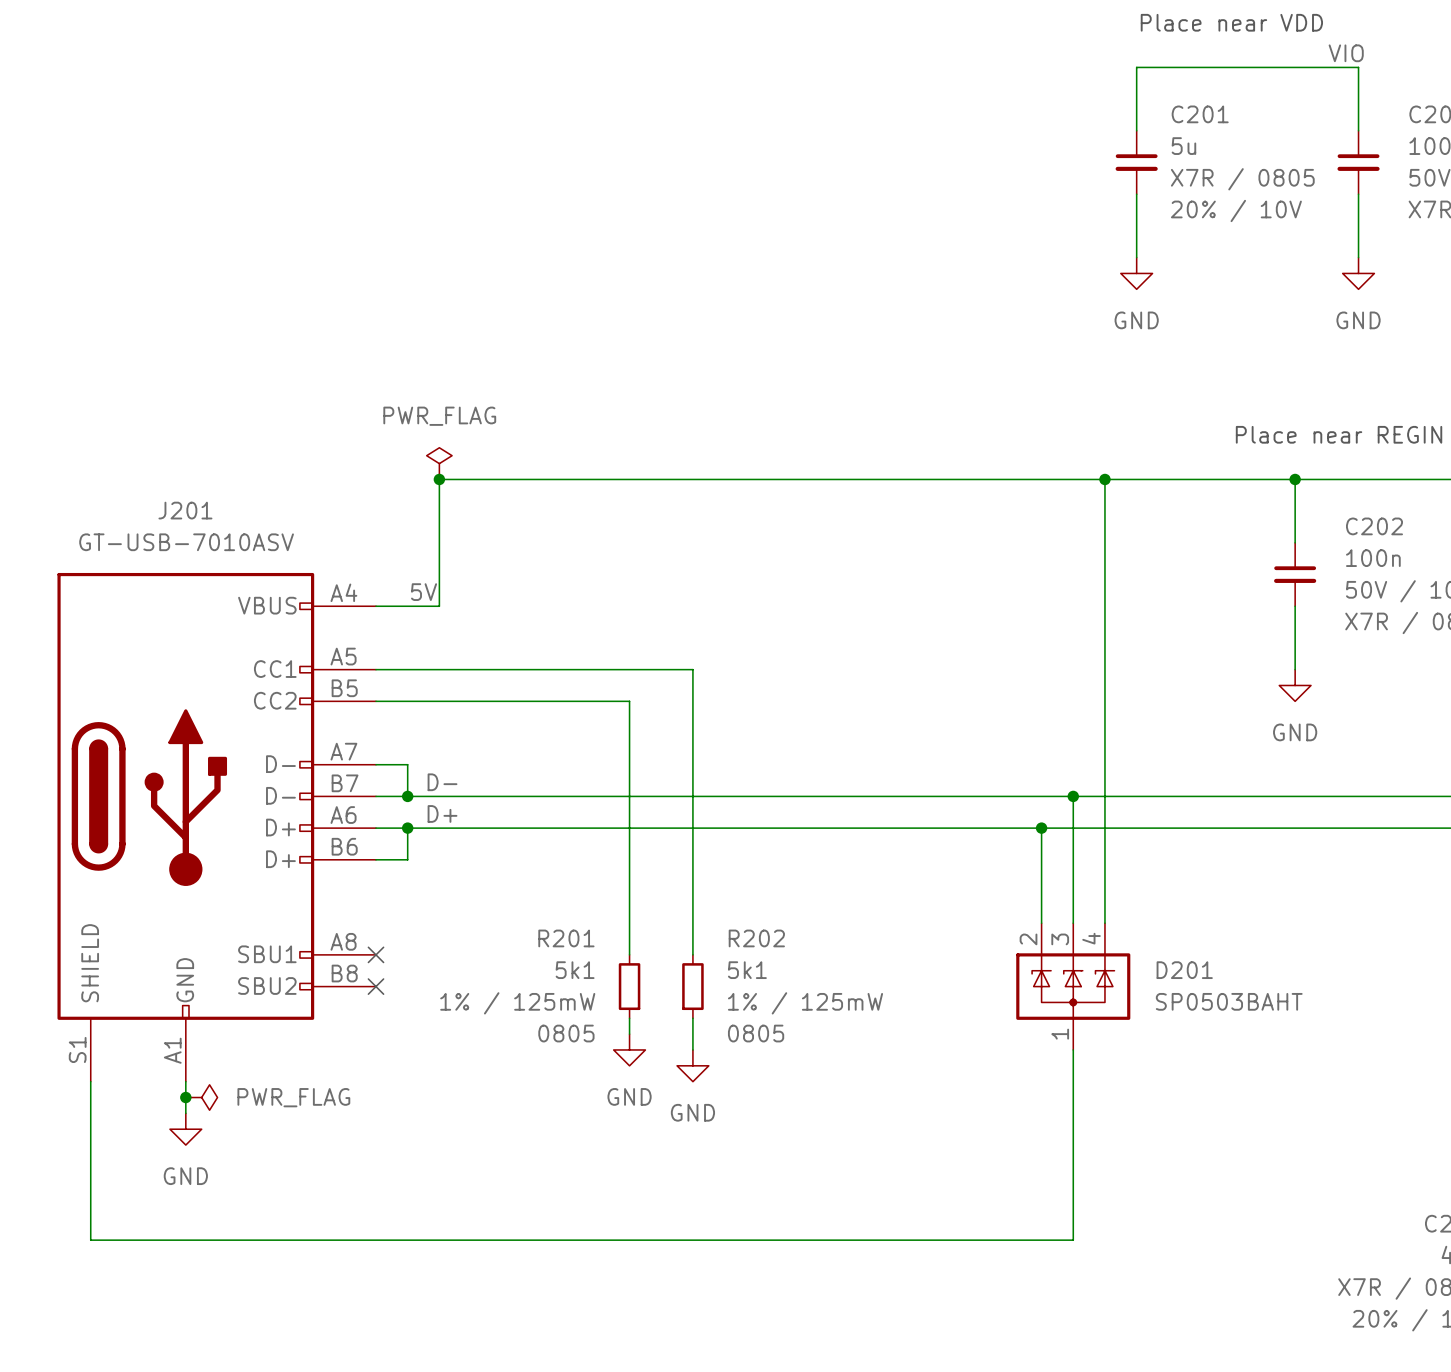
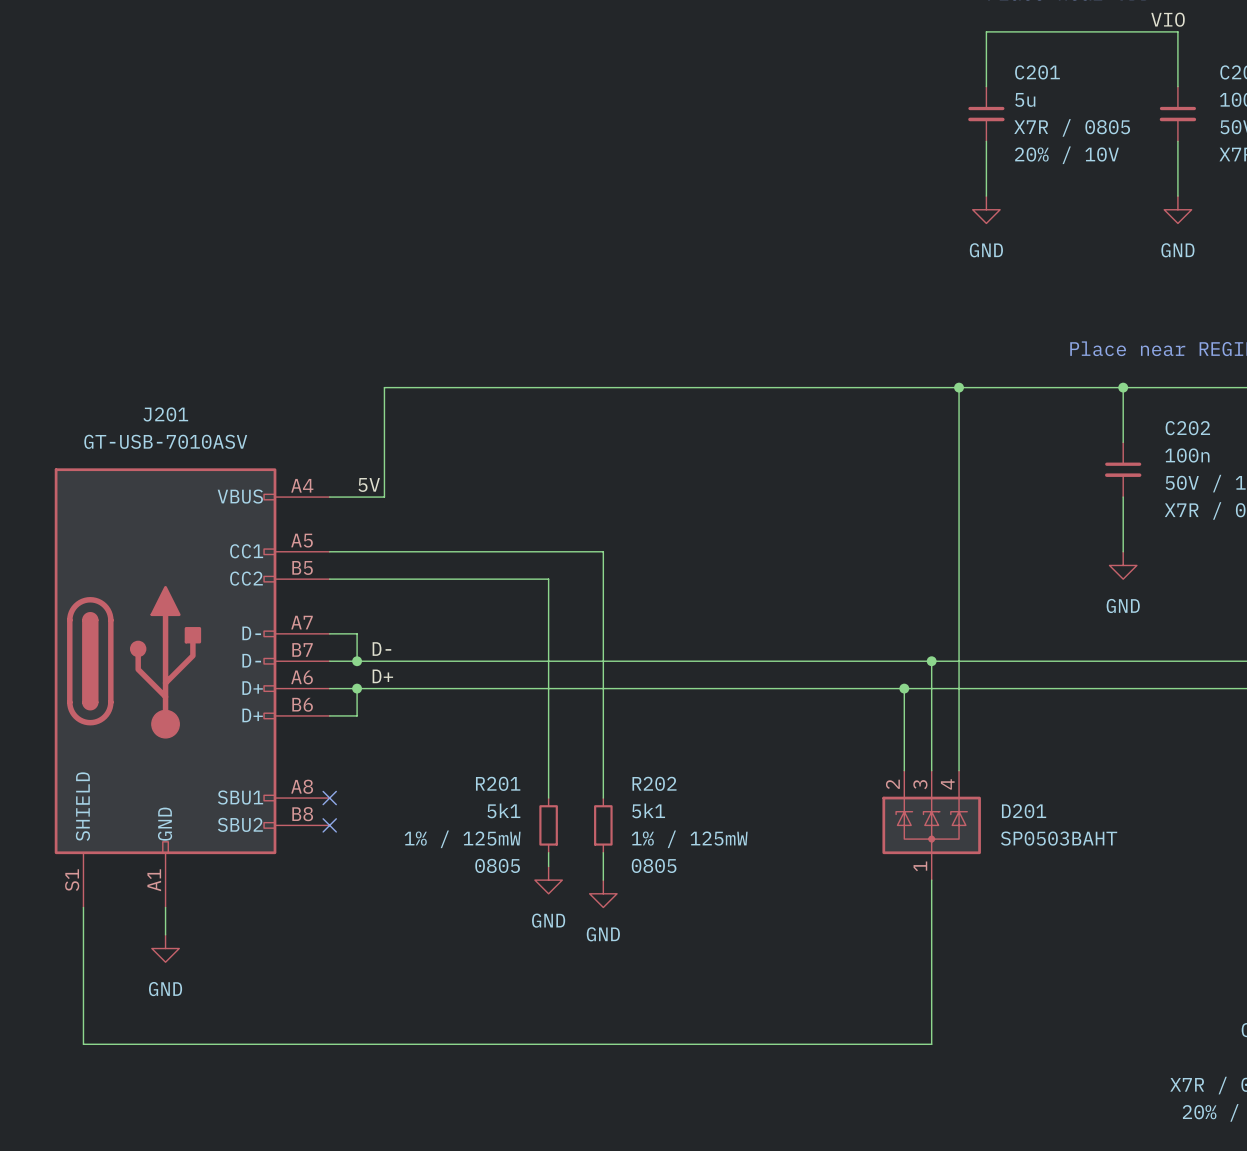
power symbol: PWR_FLAG (439, 463) -> none
junction: (439, 479) -> none
junction: (185, 1097) -> none
power symbol: PWR_FLAG (201, 1097) -> none

